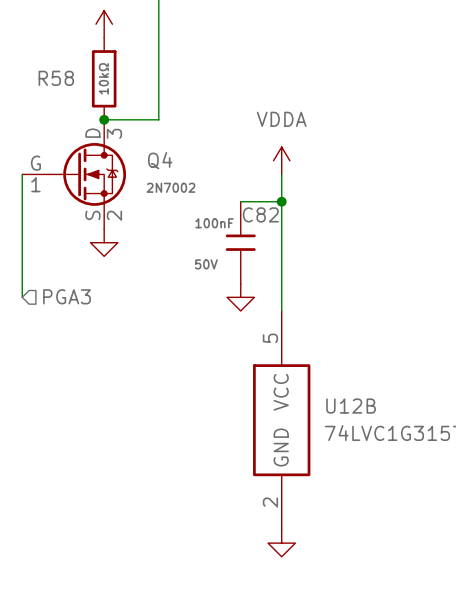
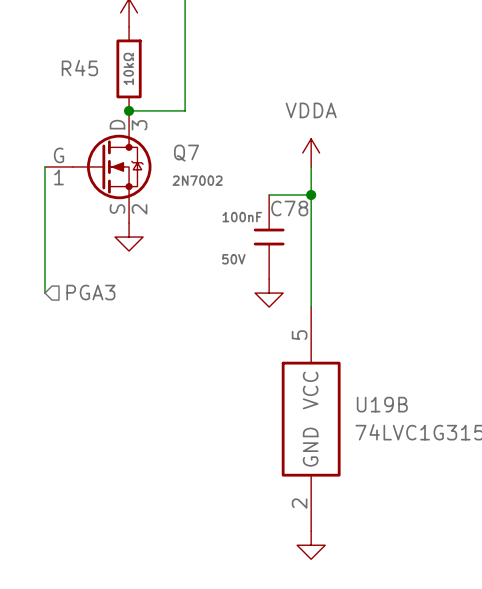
R58 name: R58 (56, 78) -> R45 (79, 68)
Q4 name: Q4 (160, 160) -> Q7 (186, 153)
C82 name: C82 (260, 214) -> C78 (289, 208)
U12B name: U12B (351, 406) -> U19B (382, 404)

